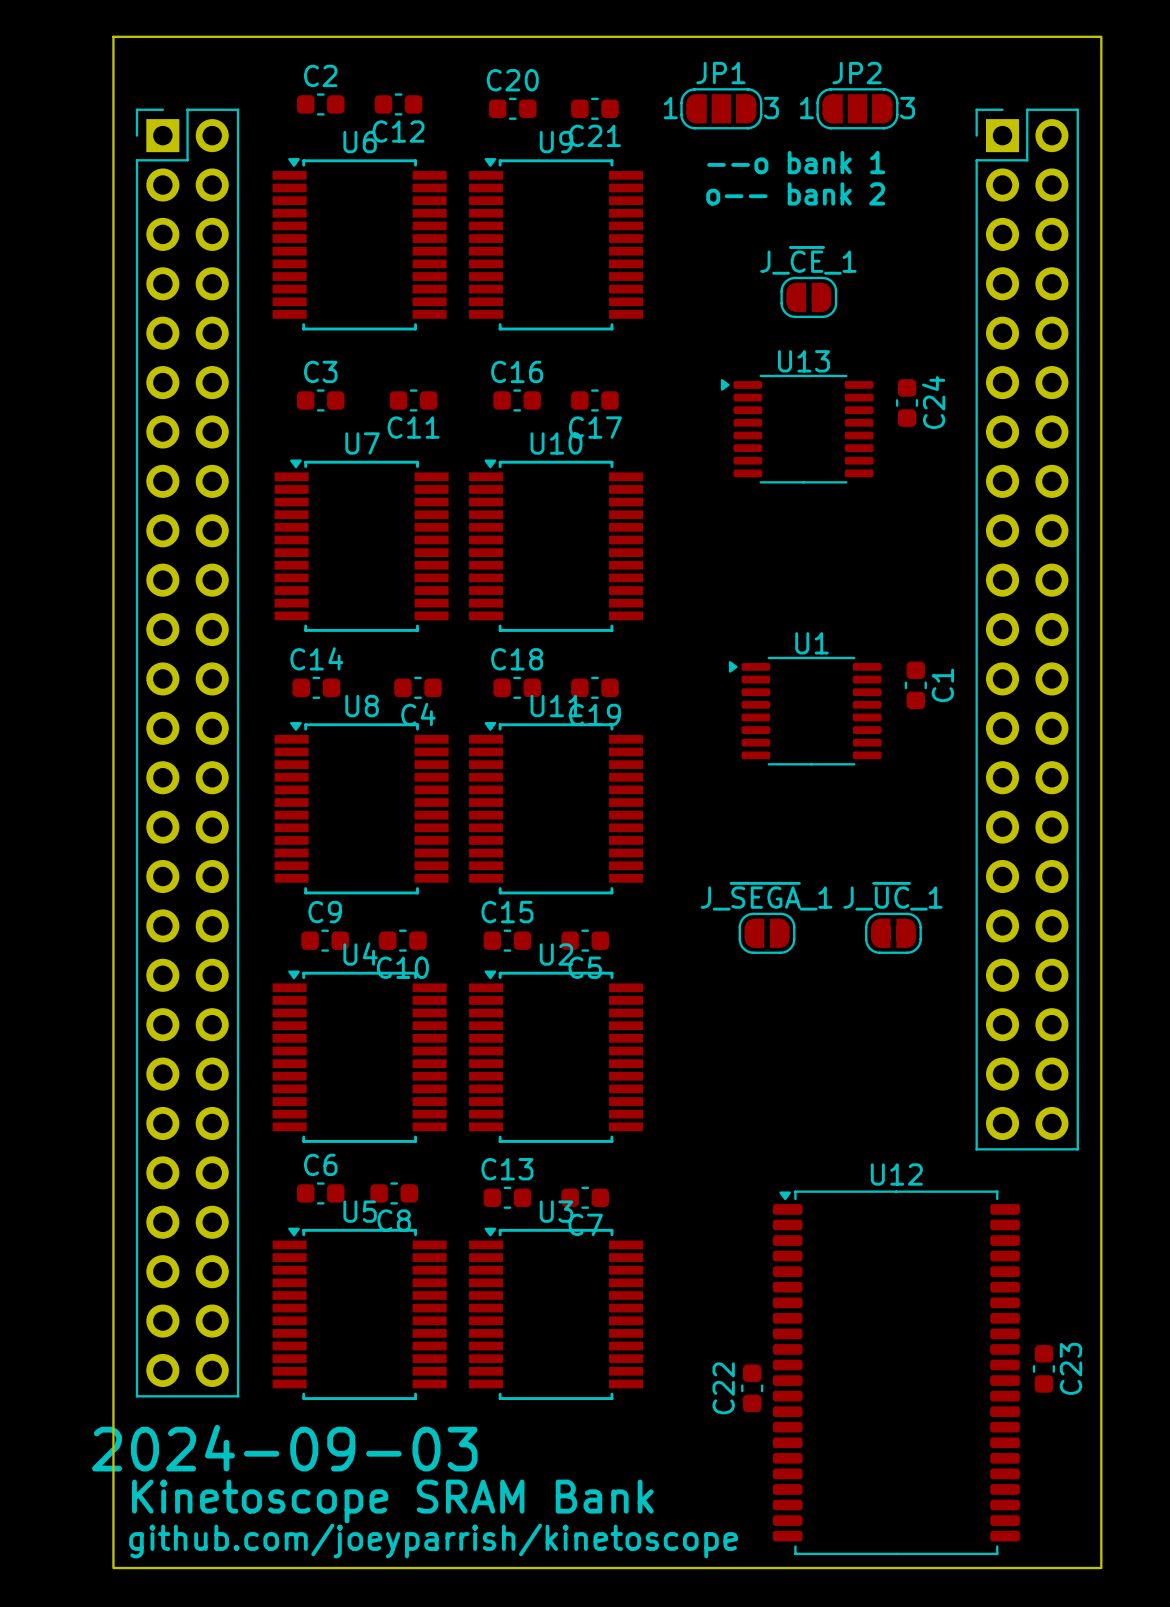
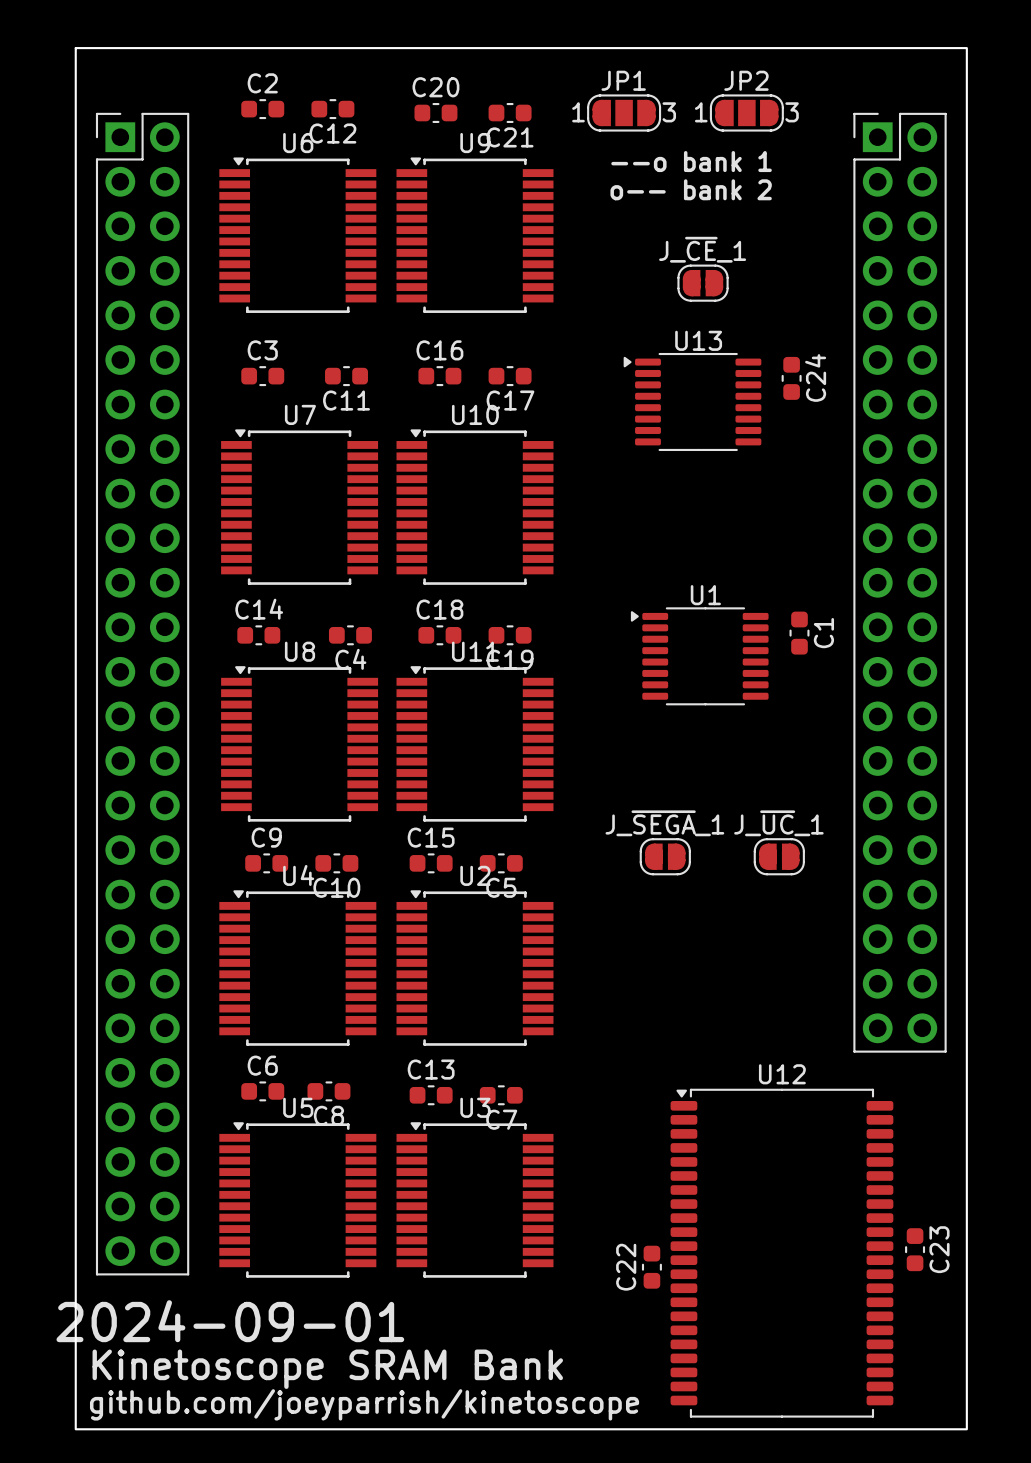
text: 2024-09-03 (284, 1448) -> 2024-09-01 (230, 1321)

